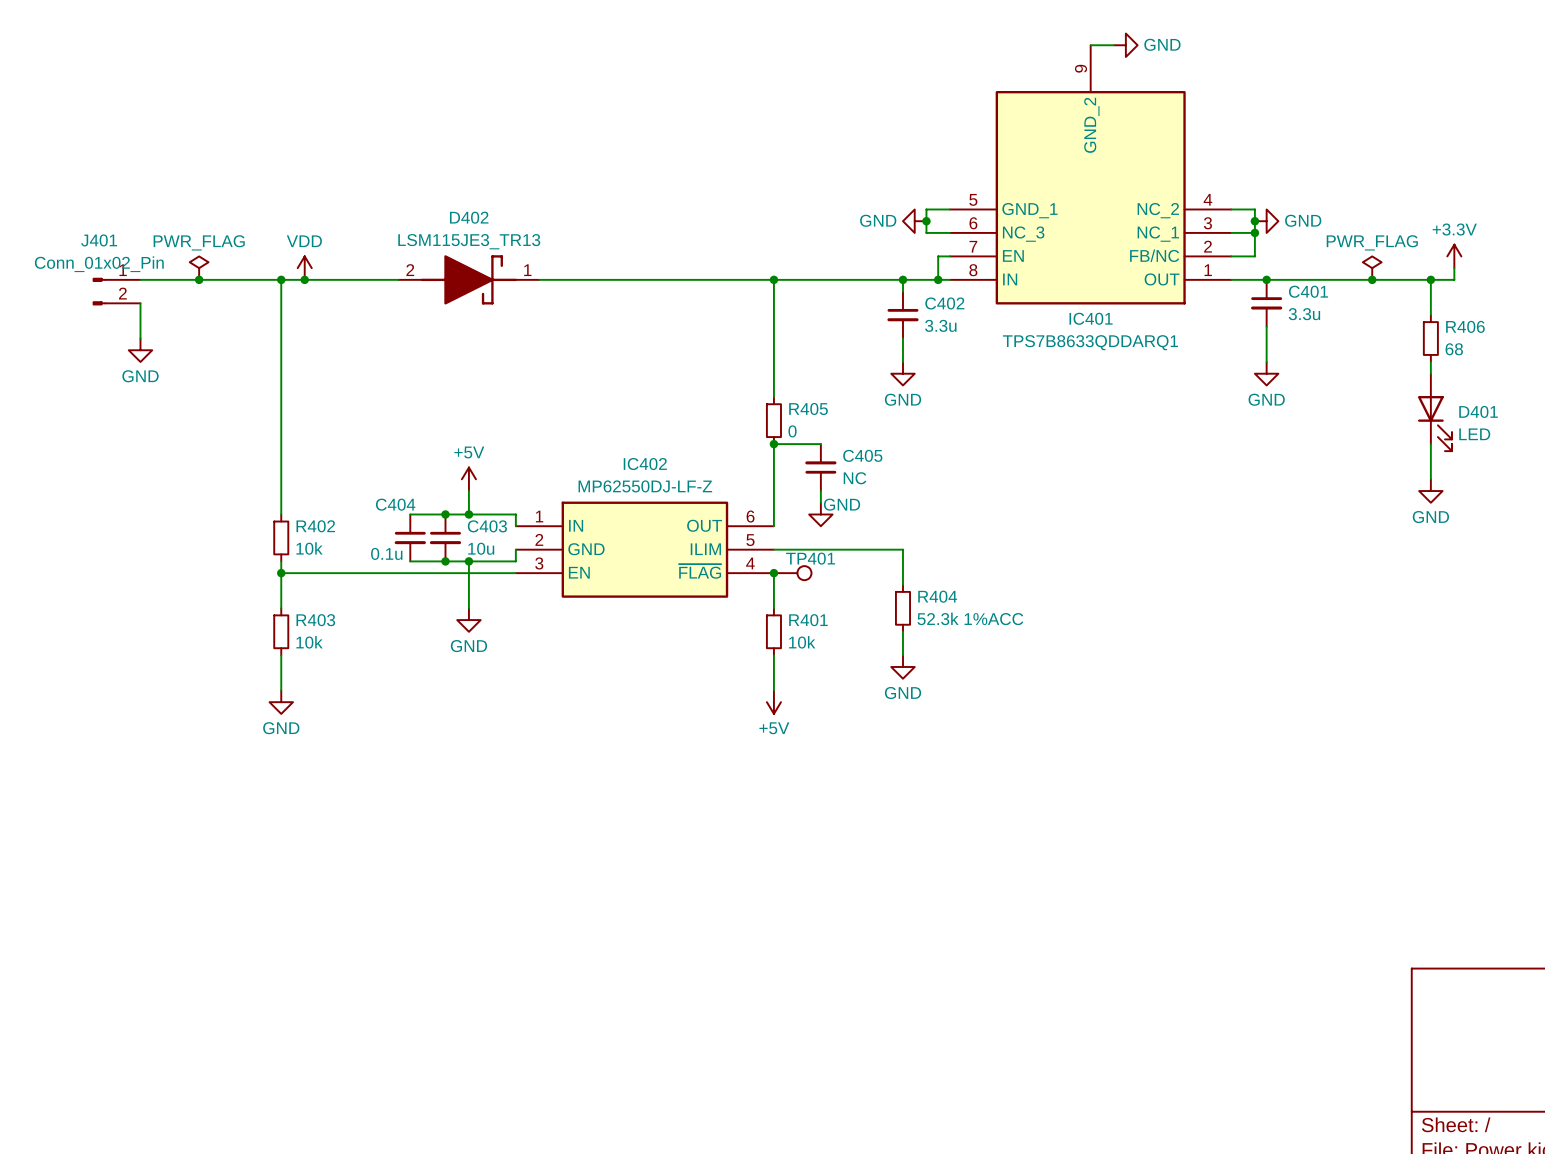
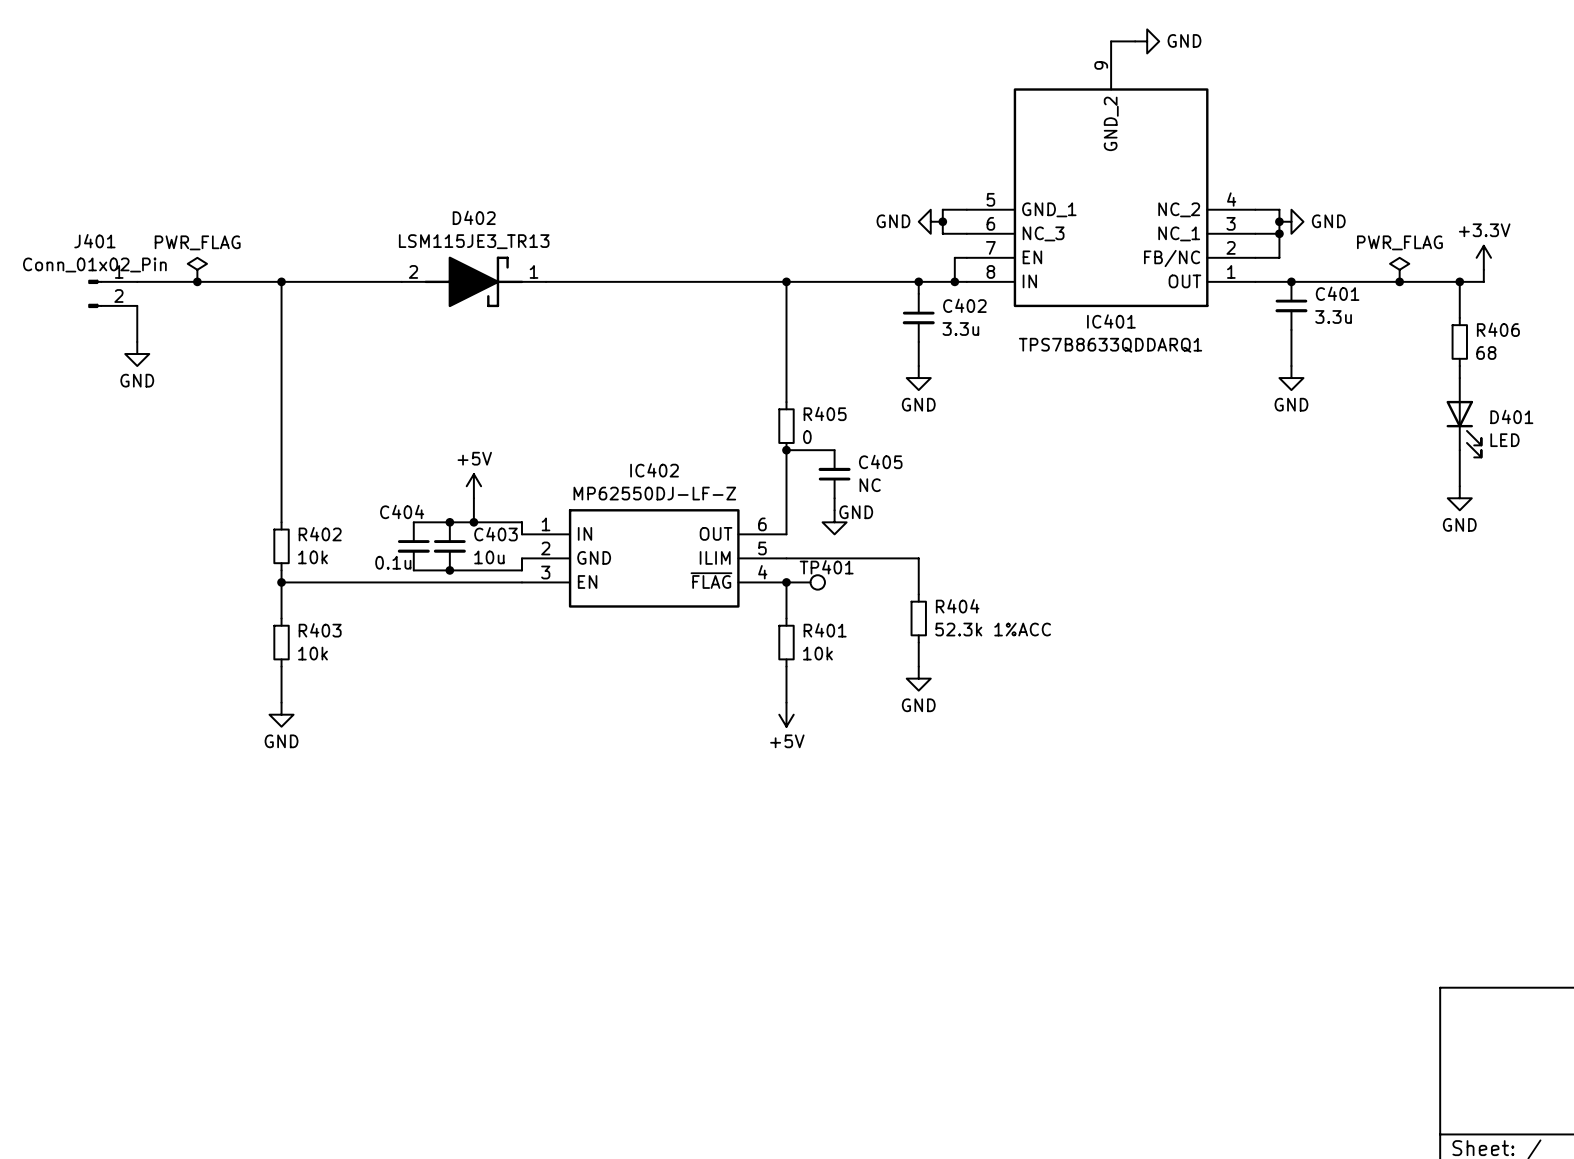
power symbol: VDD (304, 268) -> none
junction: (304, 279) -> none
wire: (468, 561) (468, 608) -> none
junction: (468, 561) -> none
power symbol: GND (468, 620) -> none

